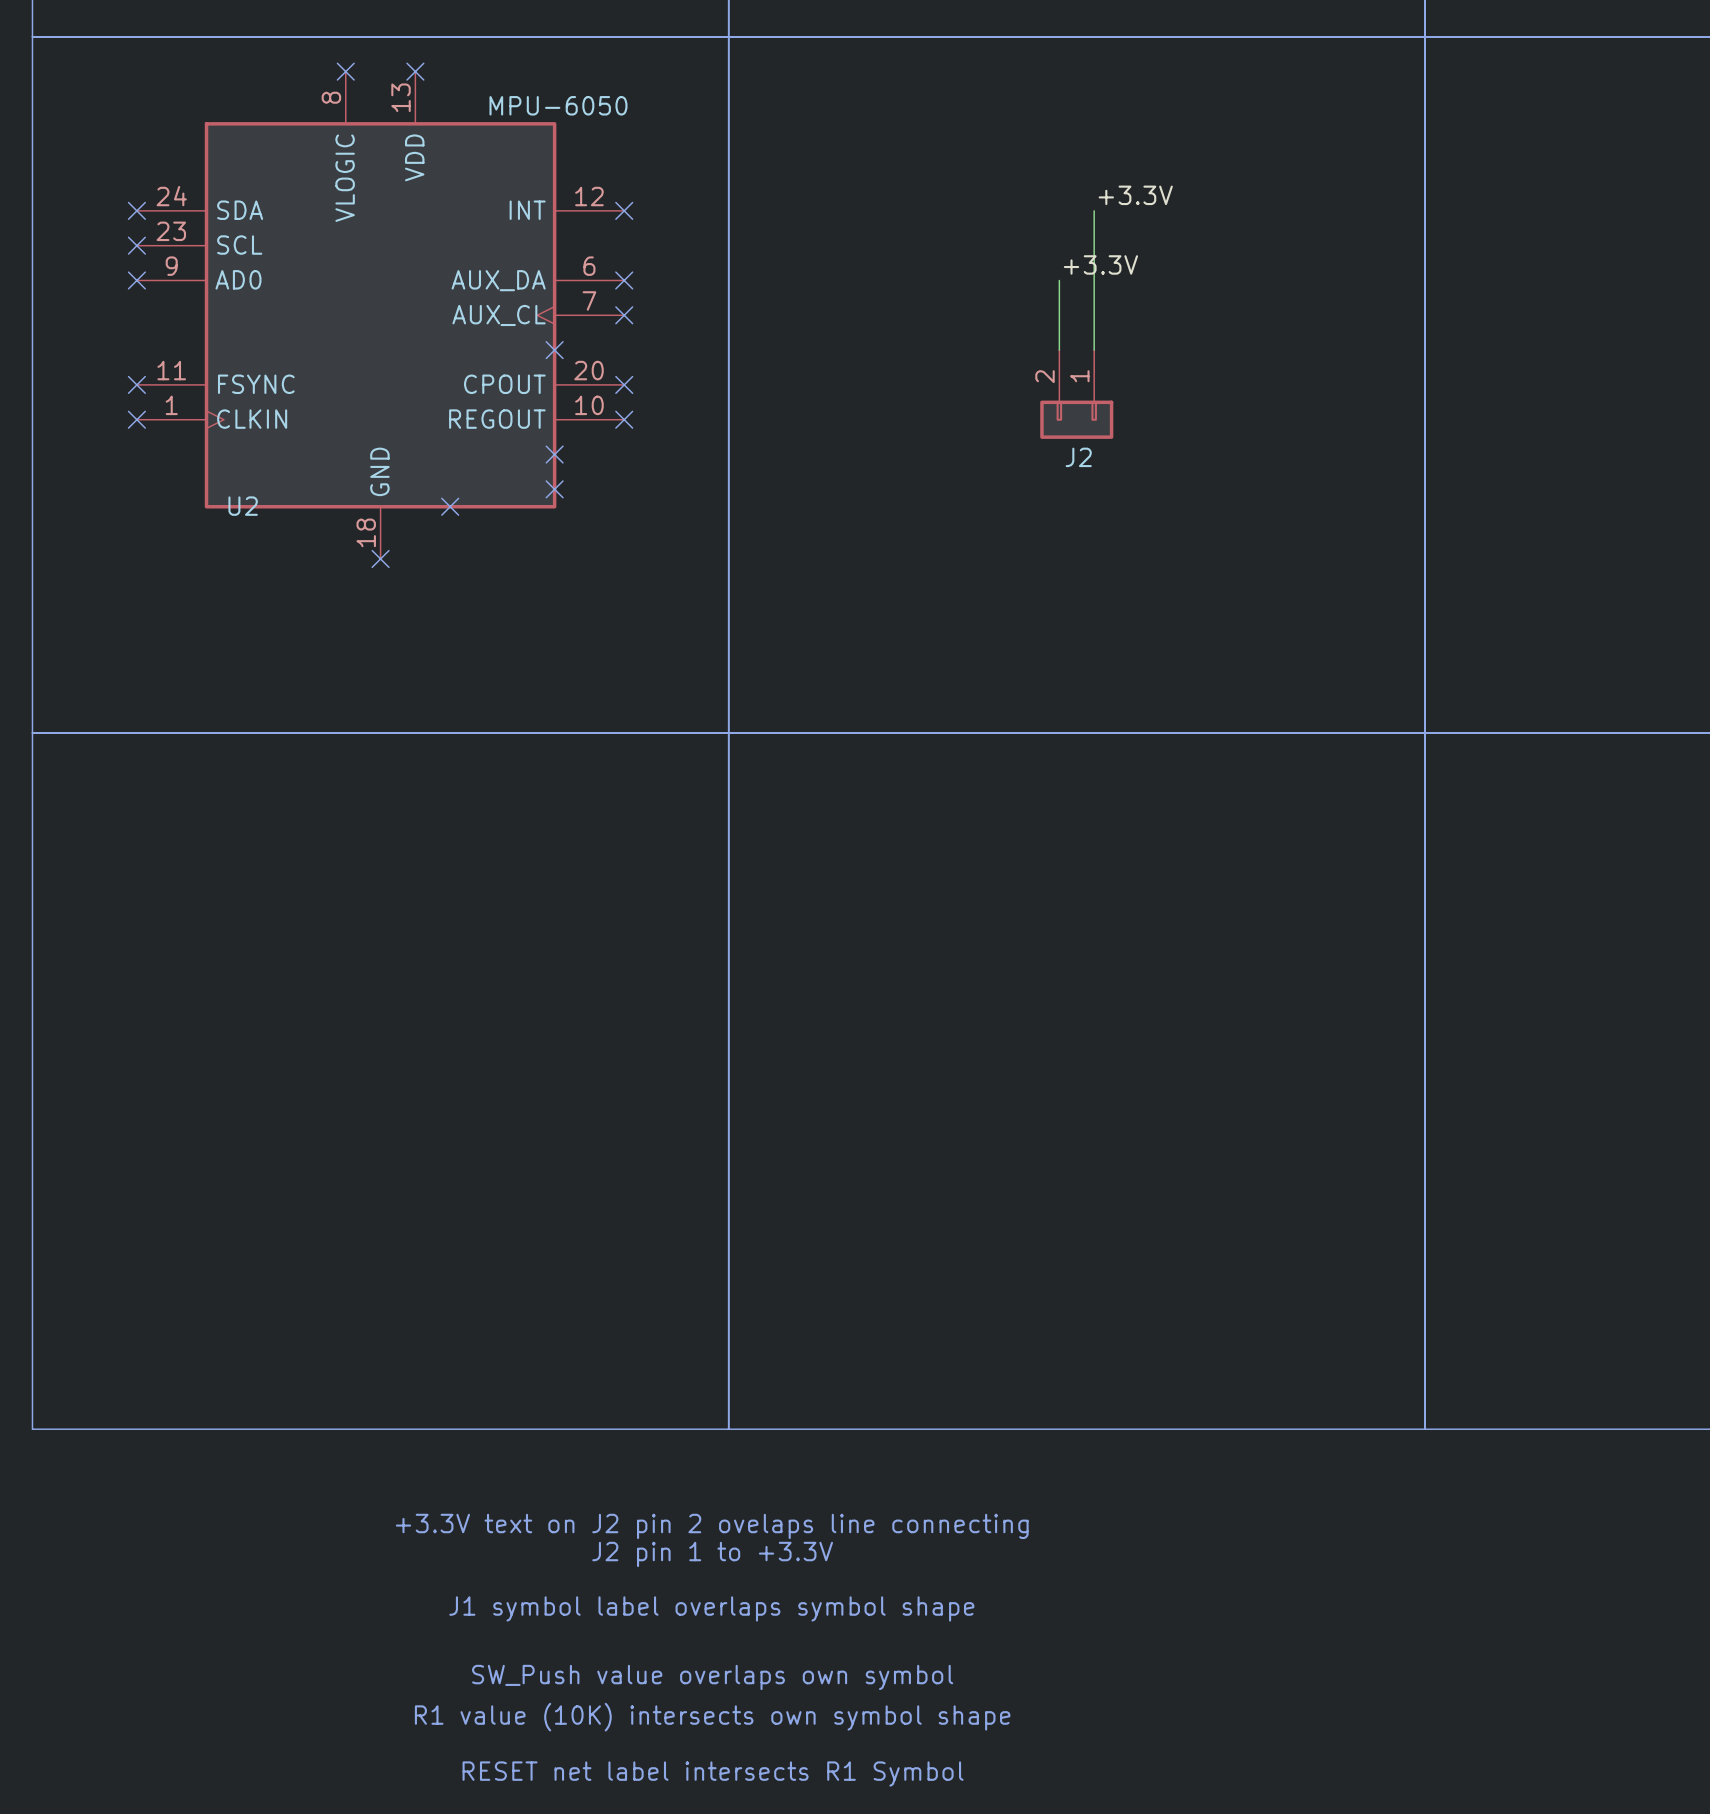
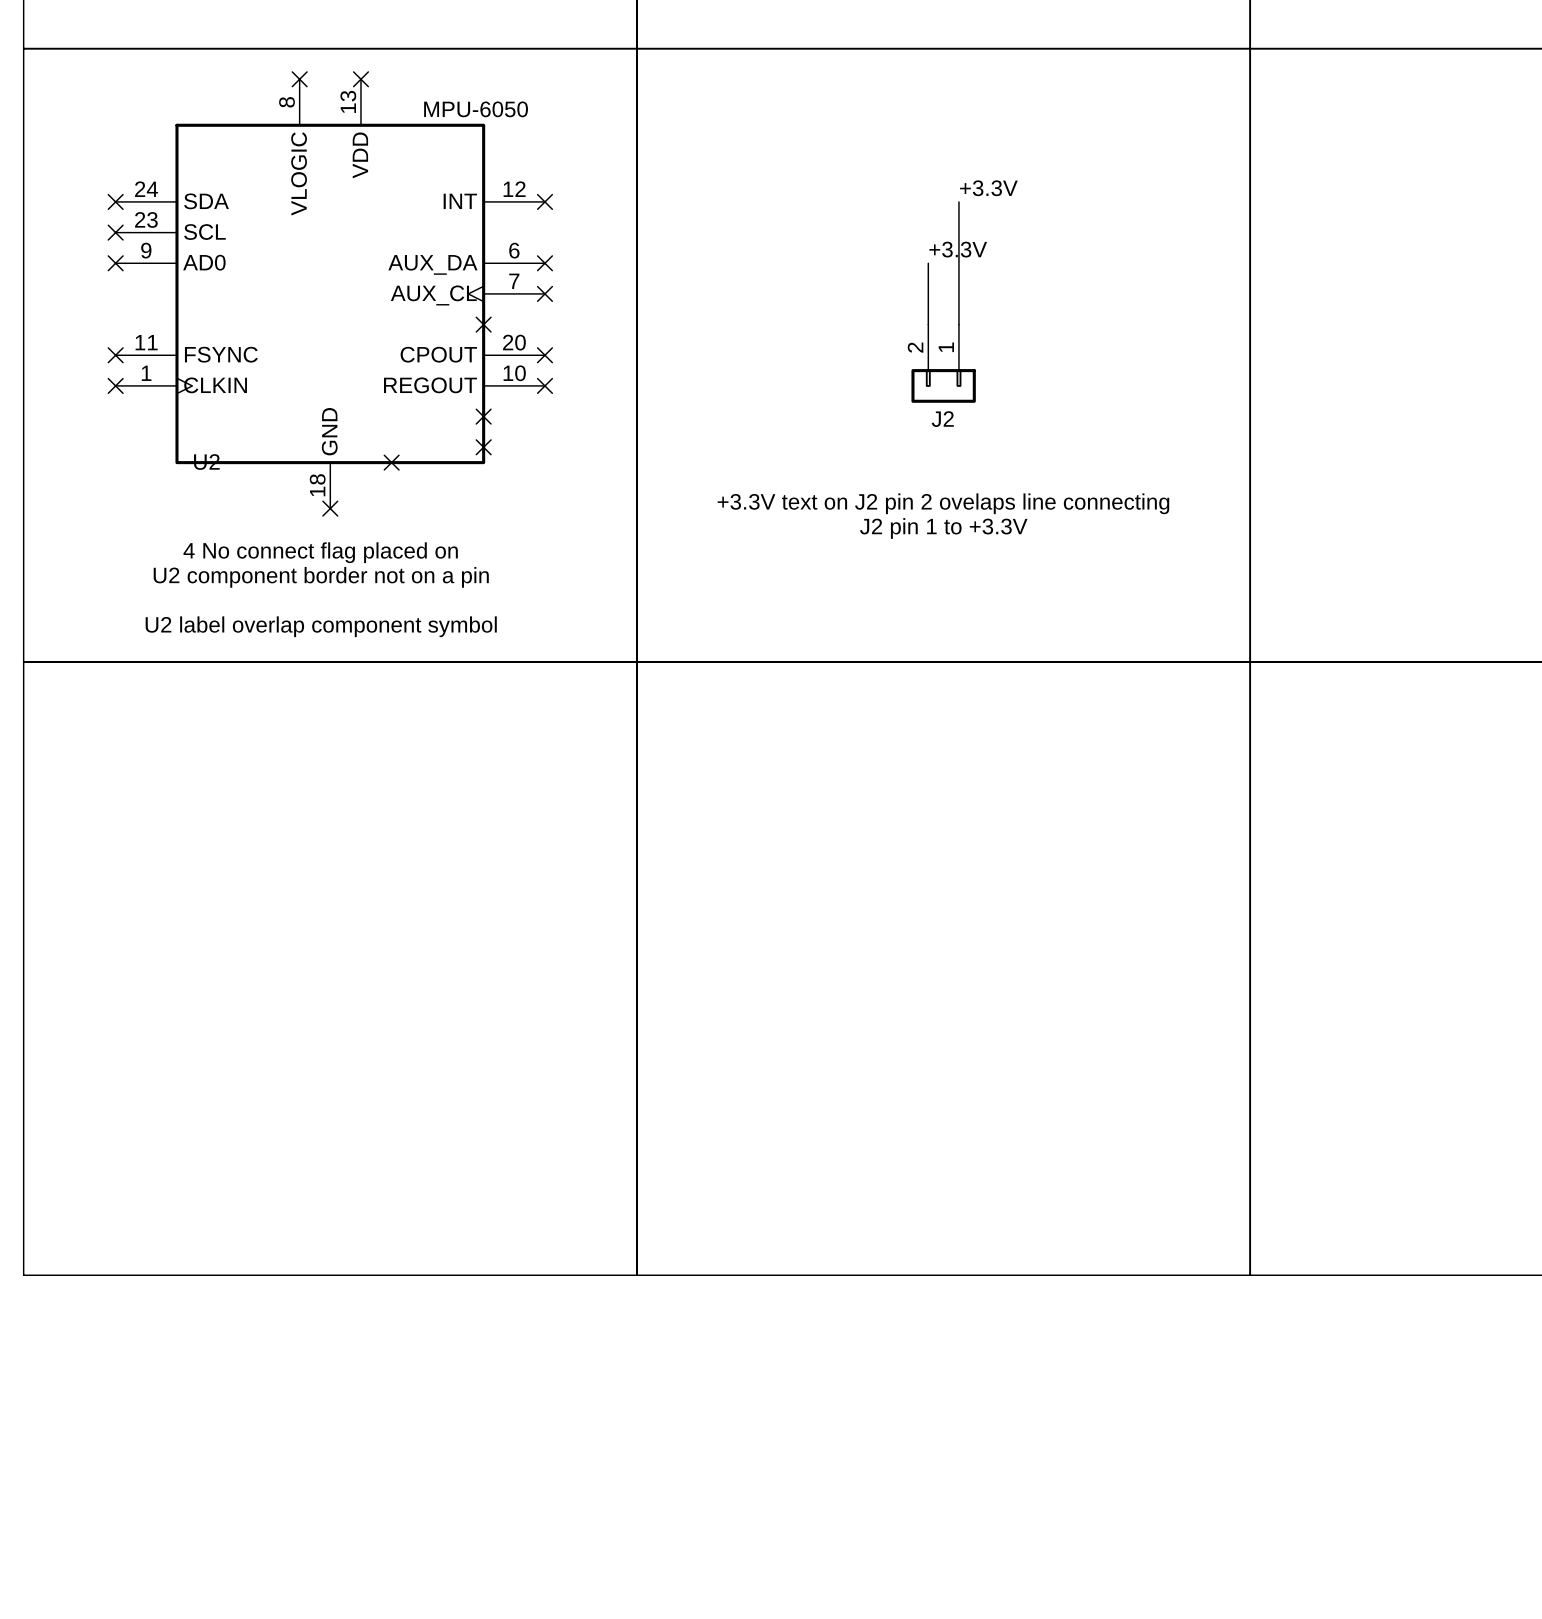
text: none -> +3.3V text on J2 pin 2 ovelaps line connecting (943, 503)
text: none -> J2 pin 1 to +3.3V (943, 528)
text: none -> 4 No connect flag placed on (320, 552)
text: none -> U2 component border not on a pin (321, 577)
text: none -> U2 label overlap component symbol (321, 626)
text: +3.3V text on J2 pin 2 ovelaps line connecting (712, 1526) -> none
text: J2 pin 1 to +3.3V (712, 1554) -> none
text: J1 symbol label overlaps symbol shape (711, 1608) -> none
text: SW_Push value overlaps own symbol (712, 1677) -> none
text: R1 value (10K) intersects own symbol shape (712, 1717) -> none
text: RESET net label intersects R1 Symbol (713, 1774) -> none

